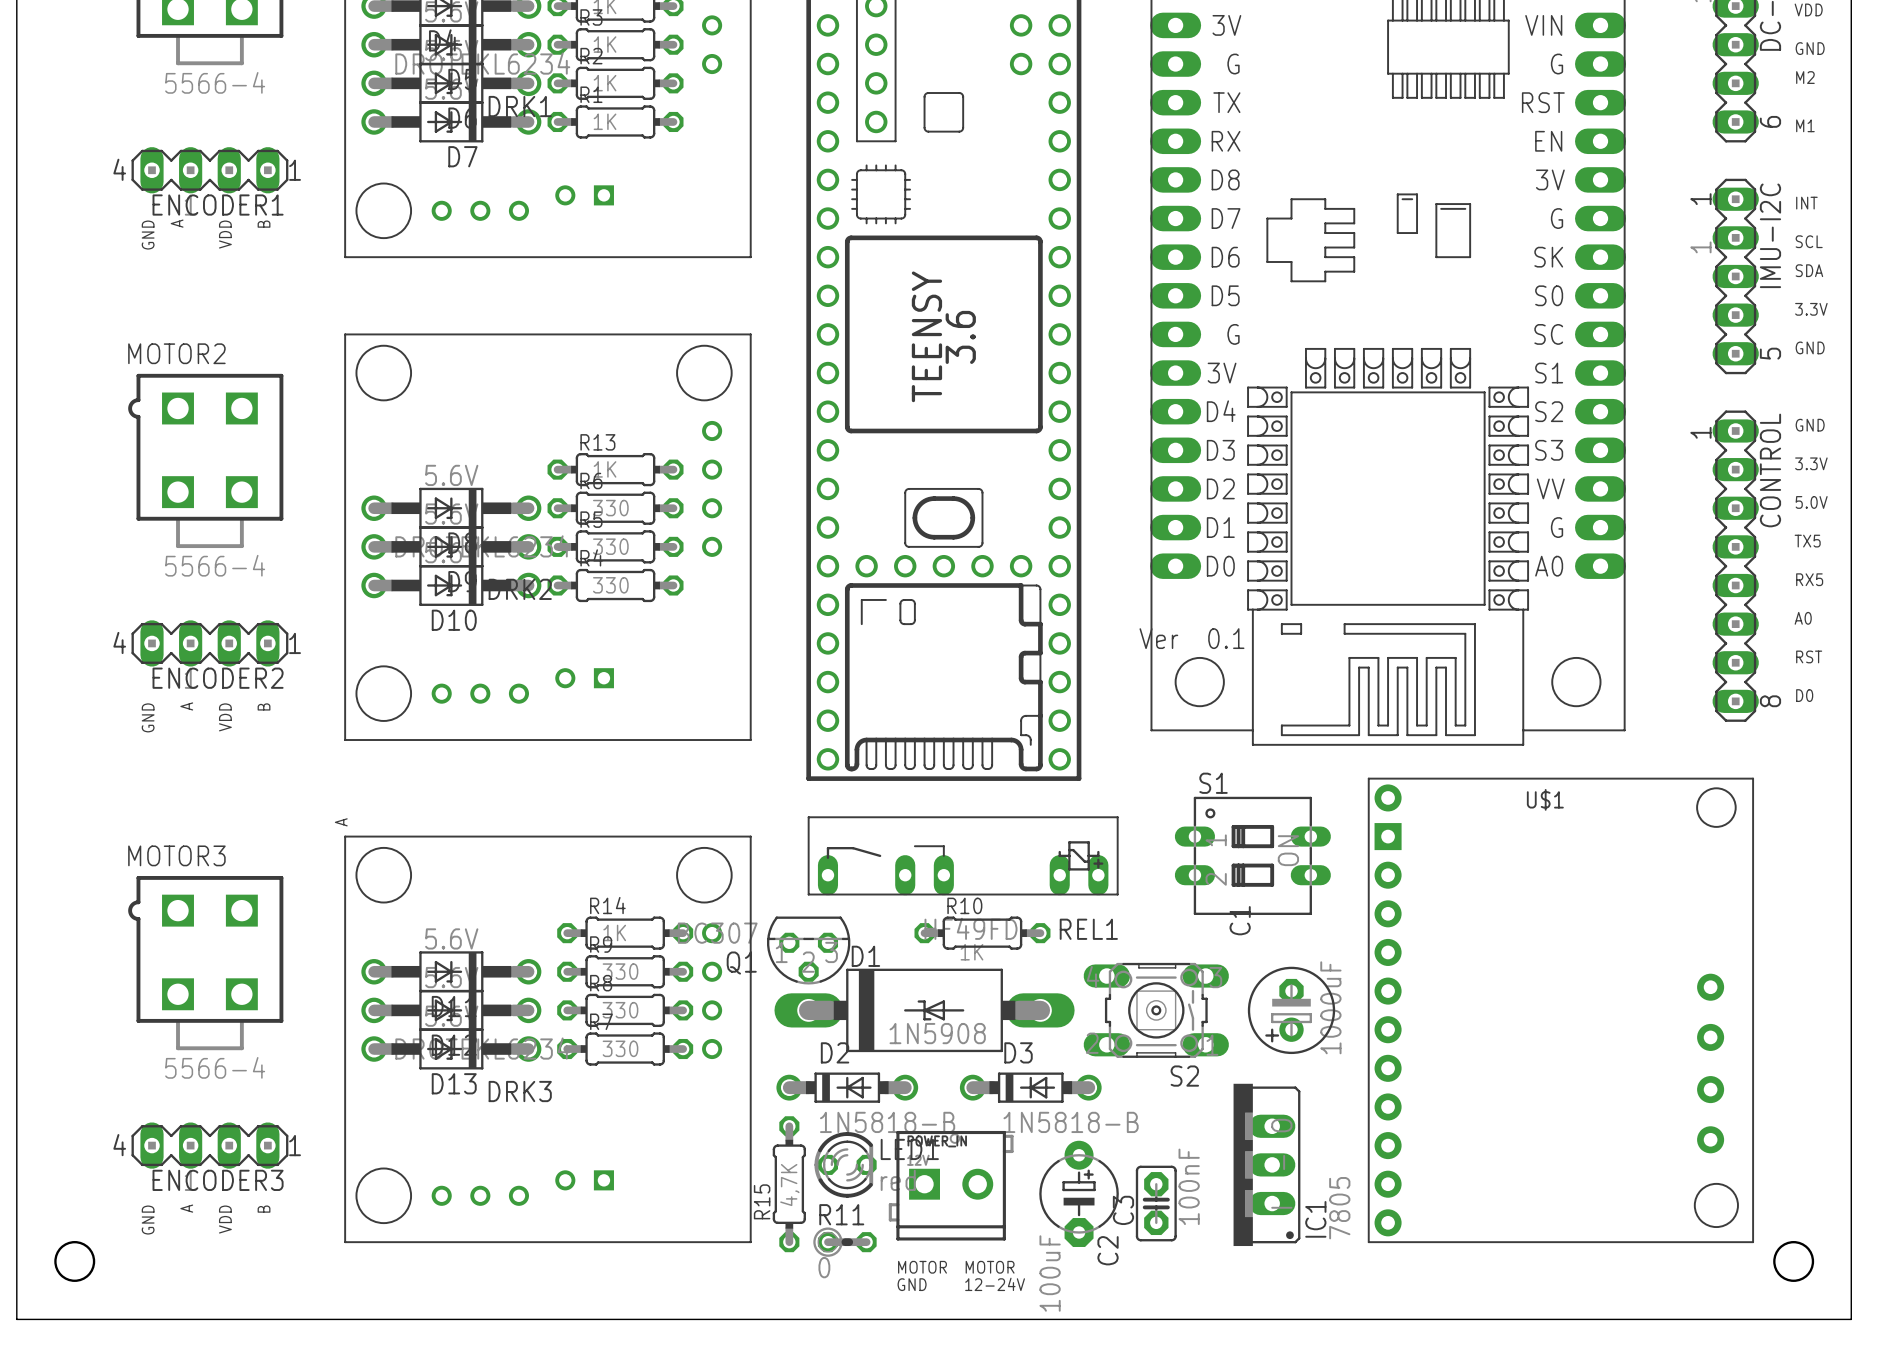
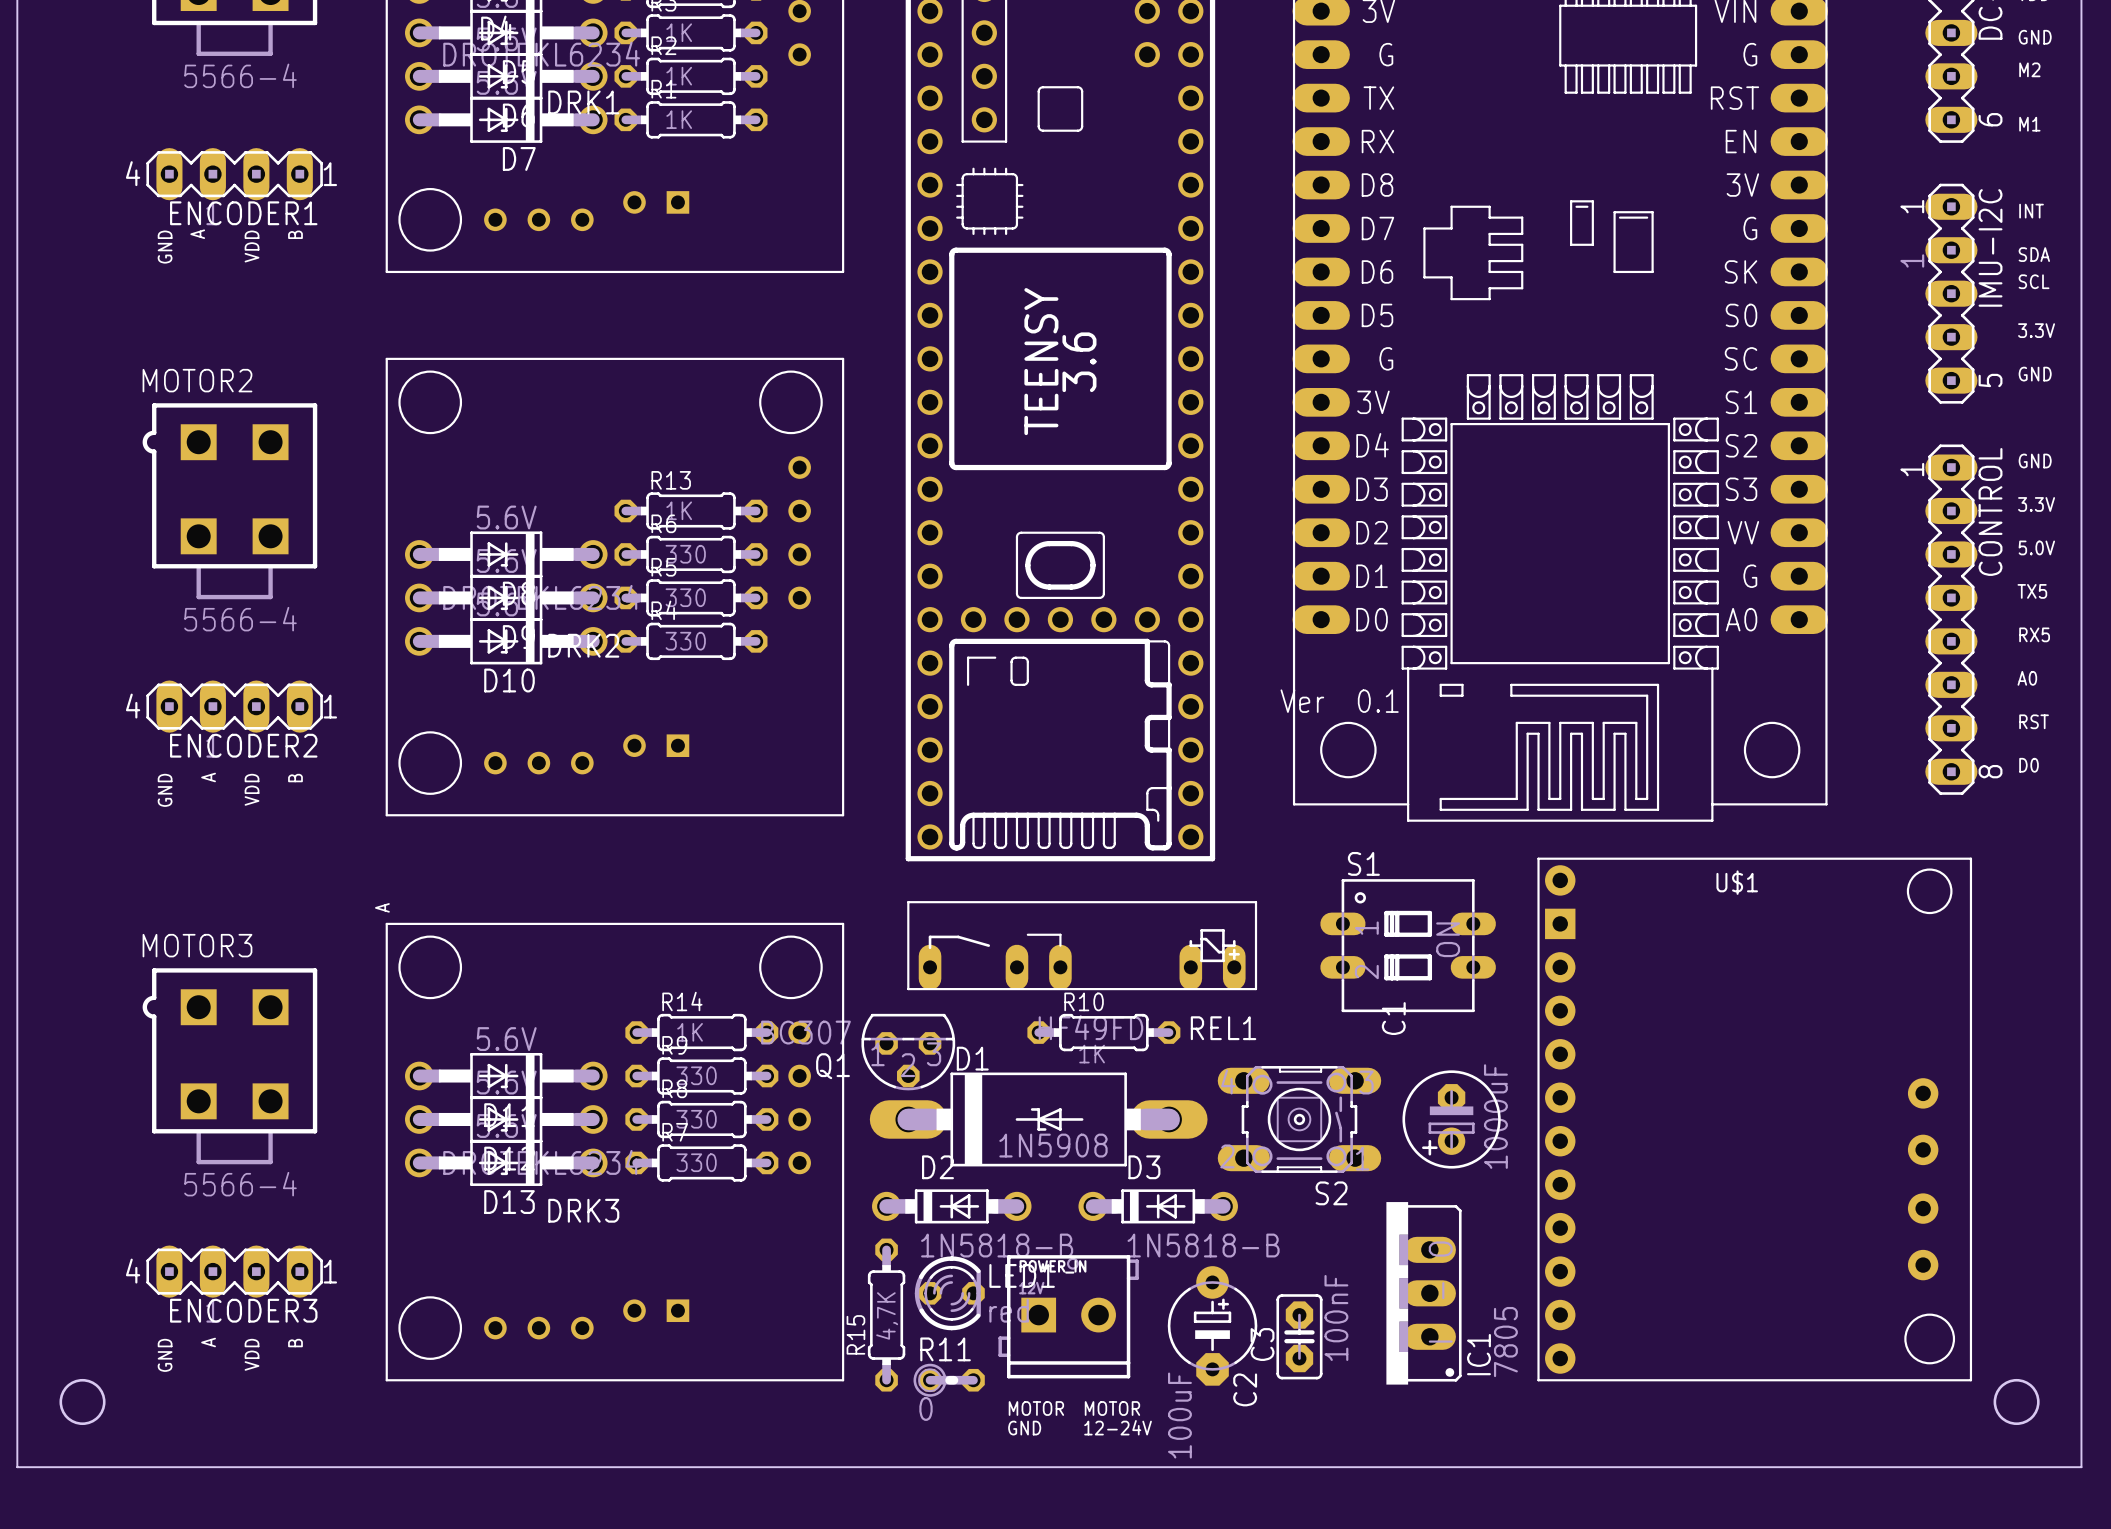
text: SCL (1809, 241) -> SDA (2034, 254)
text: SDA (1809, 270) -> SCL (2034, 281)

